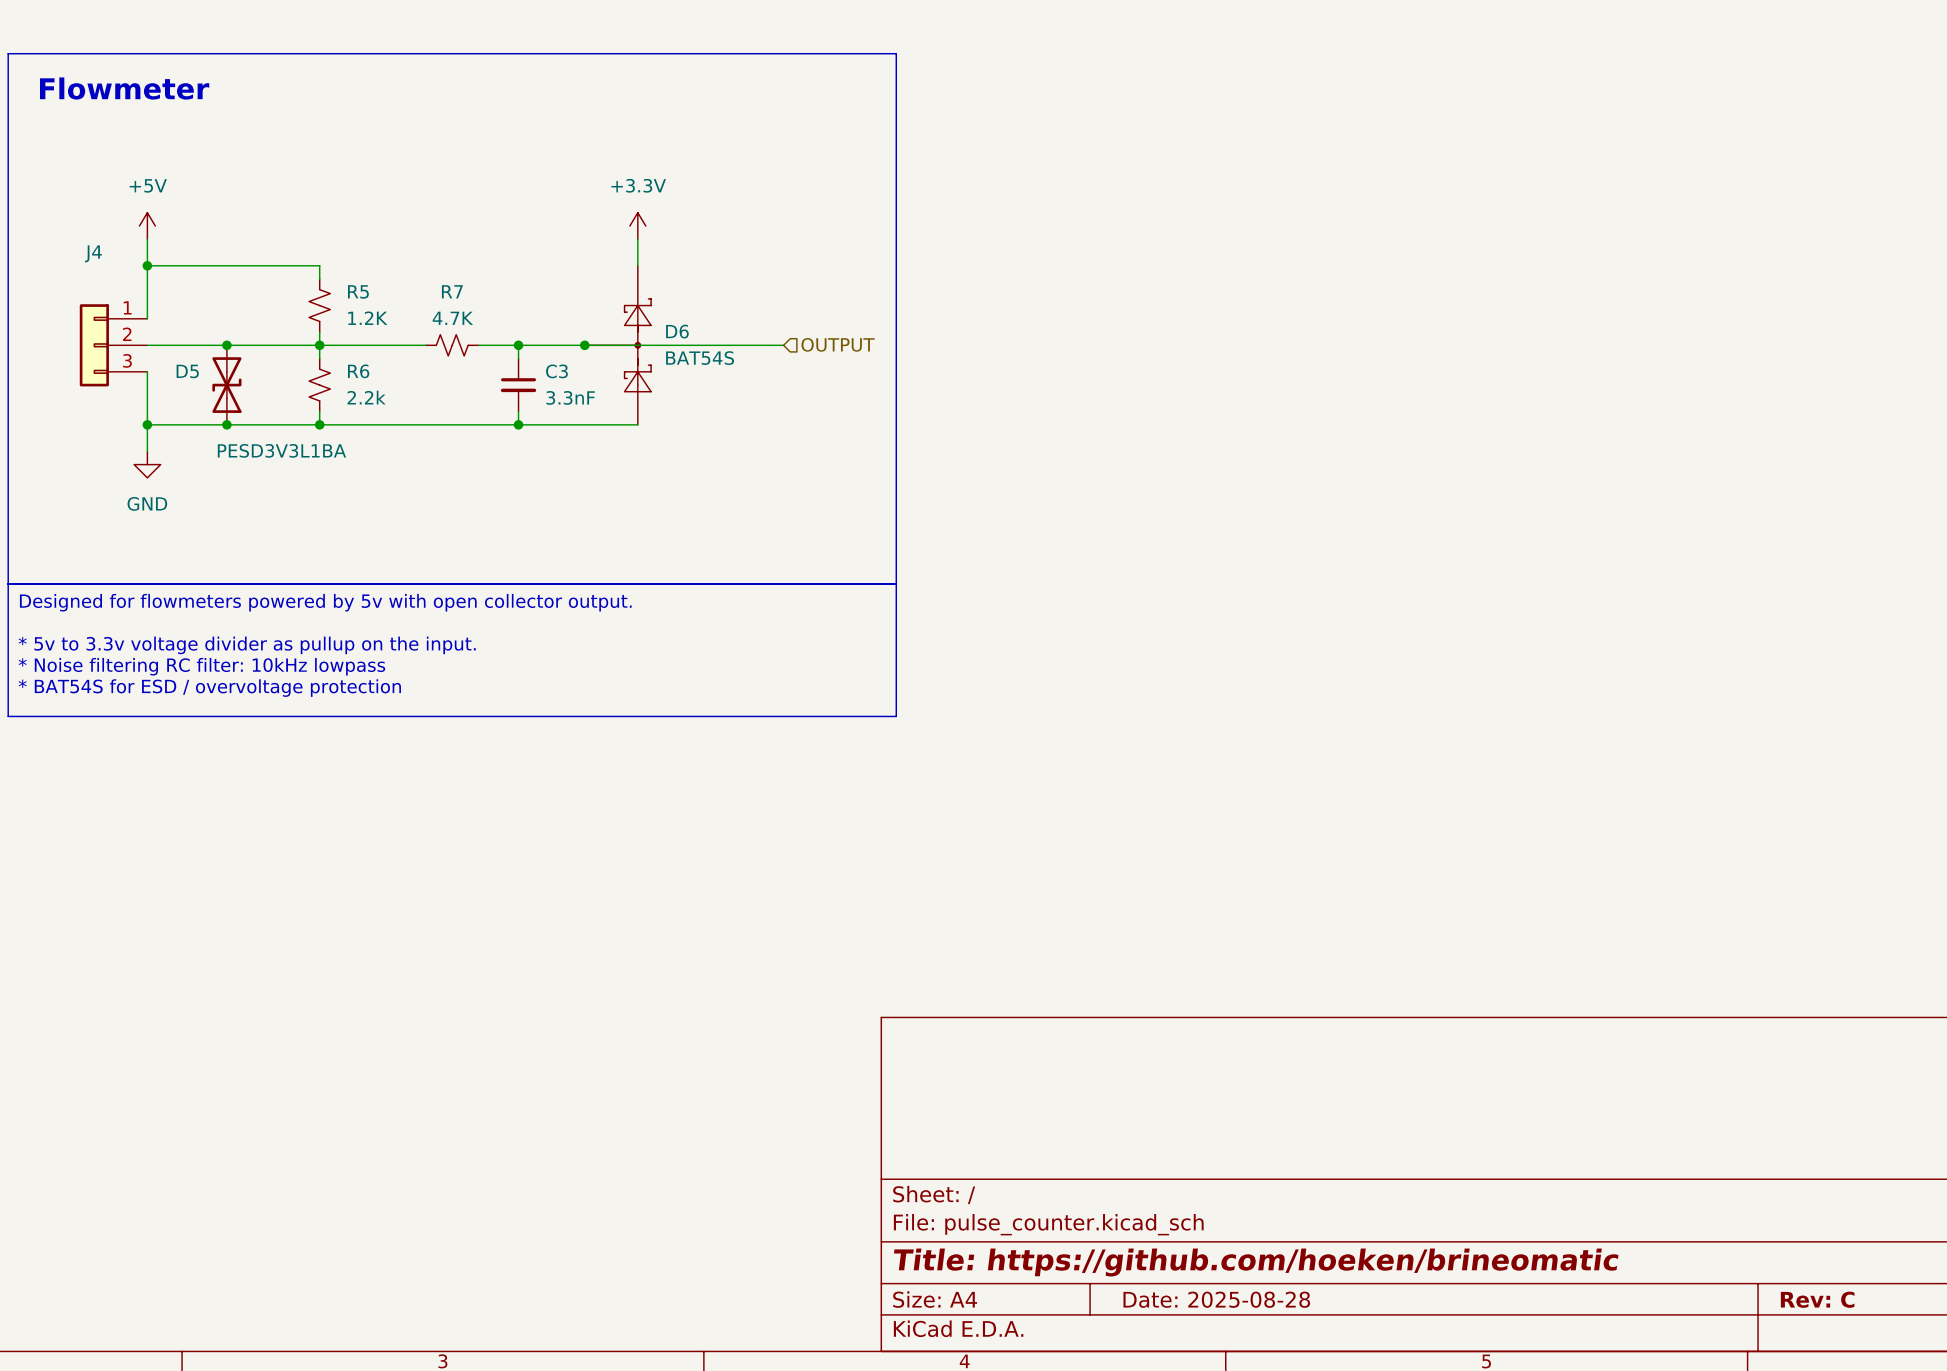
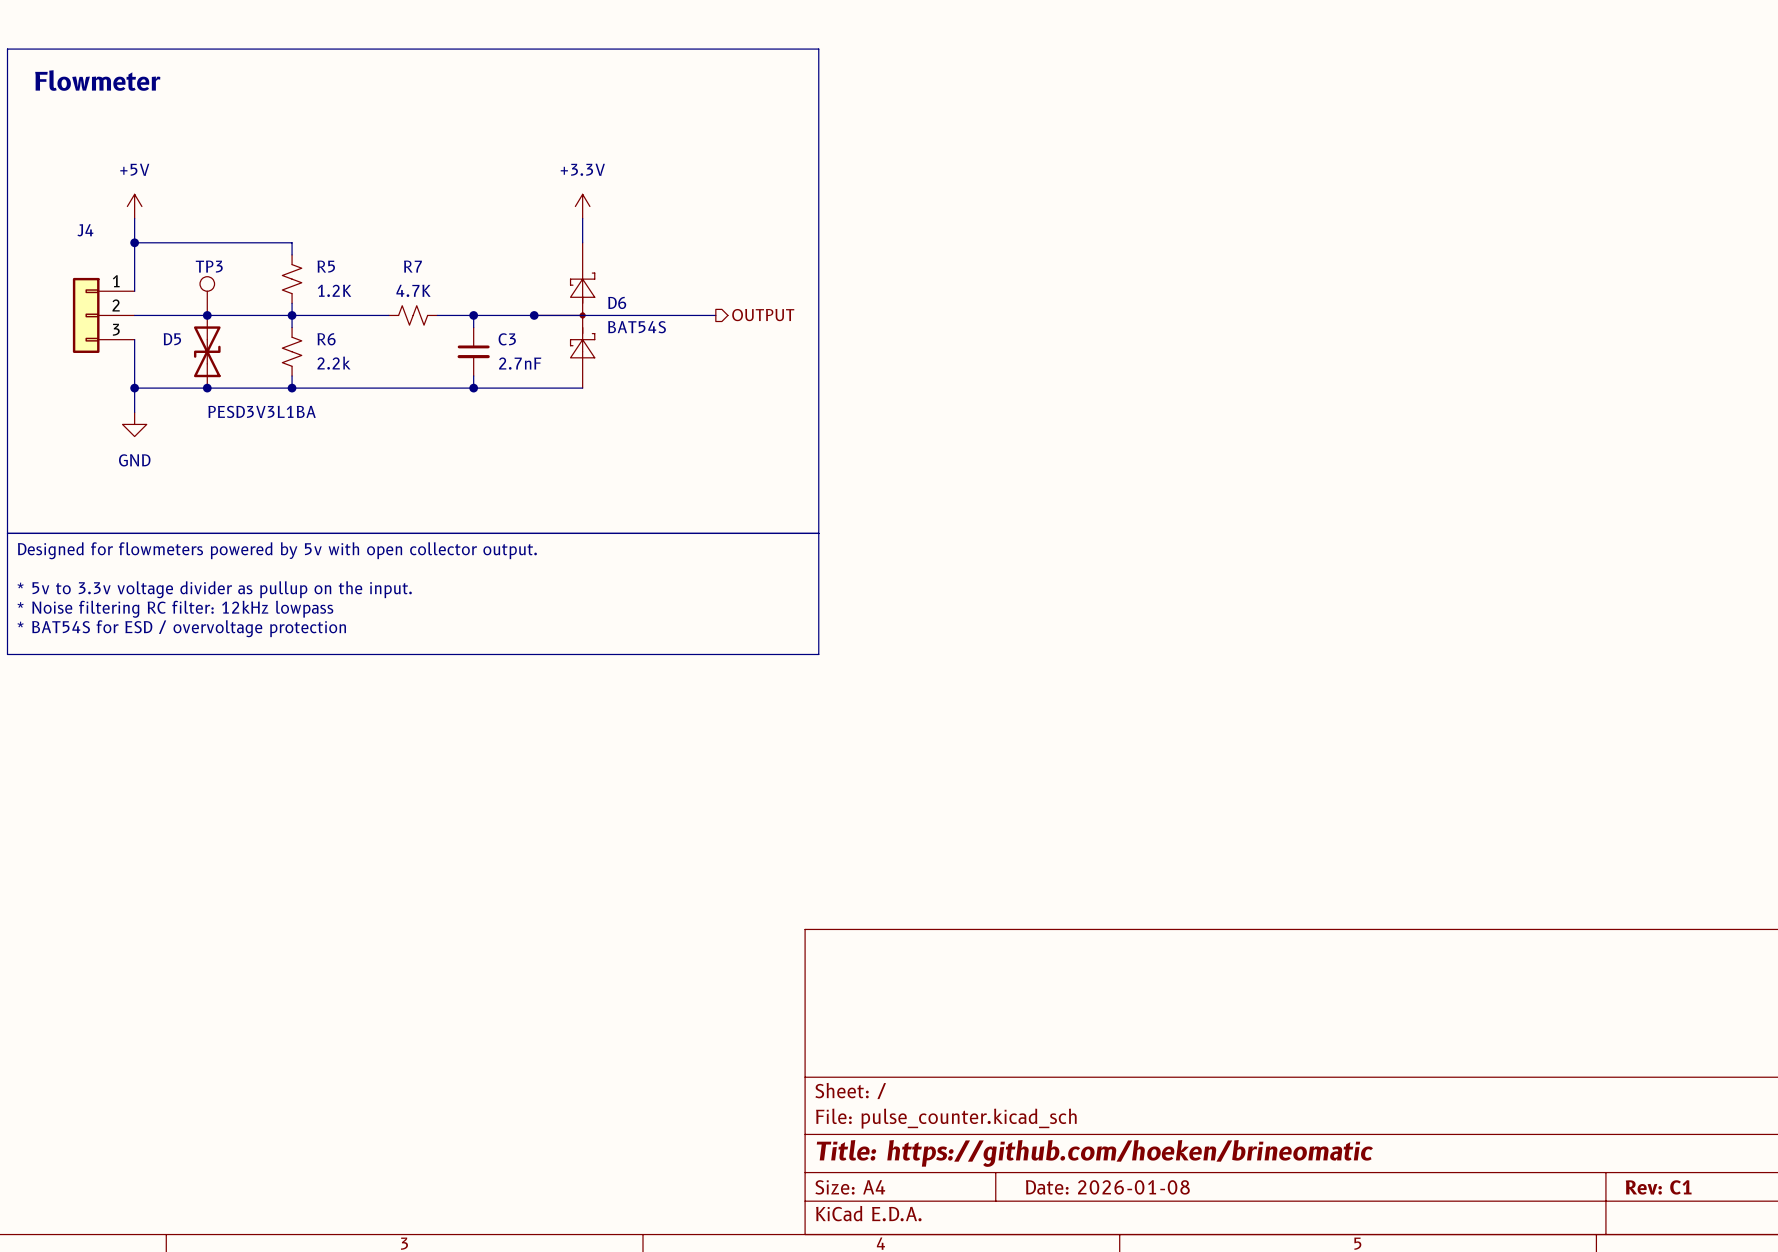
TP3: none -> (207, 296)
hierarchical label shape: input (838, 344) -> output (763, 315)
C3 value: 3.3nF (570, 397) -> 2.7nF (520, 363)
text: * Noise filtering RC filter: 10kHz lowpass (201, 666) -> * Noise filtering RC filter: 12kHz lowpass (175, 609)
title block: Date: 2025-08-28 (1216, 1299) -> Date: 2026-01-08 (1107, 1187)
title block: Rev: C (1817, 1299) -> Rev: C1 (1658, 1187)

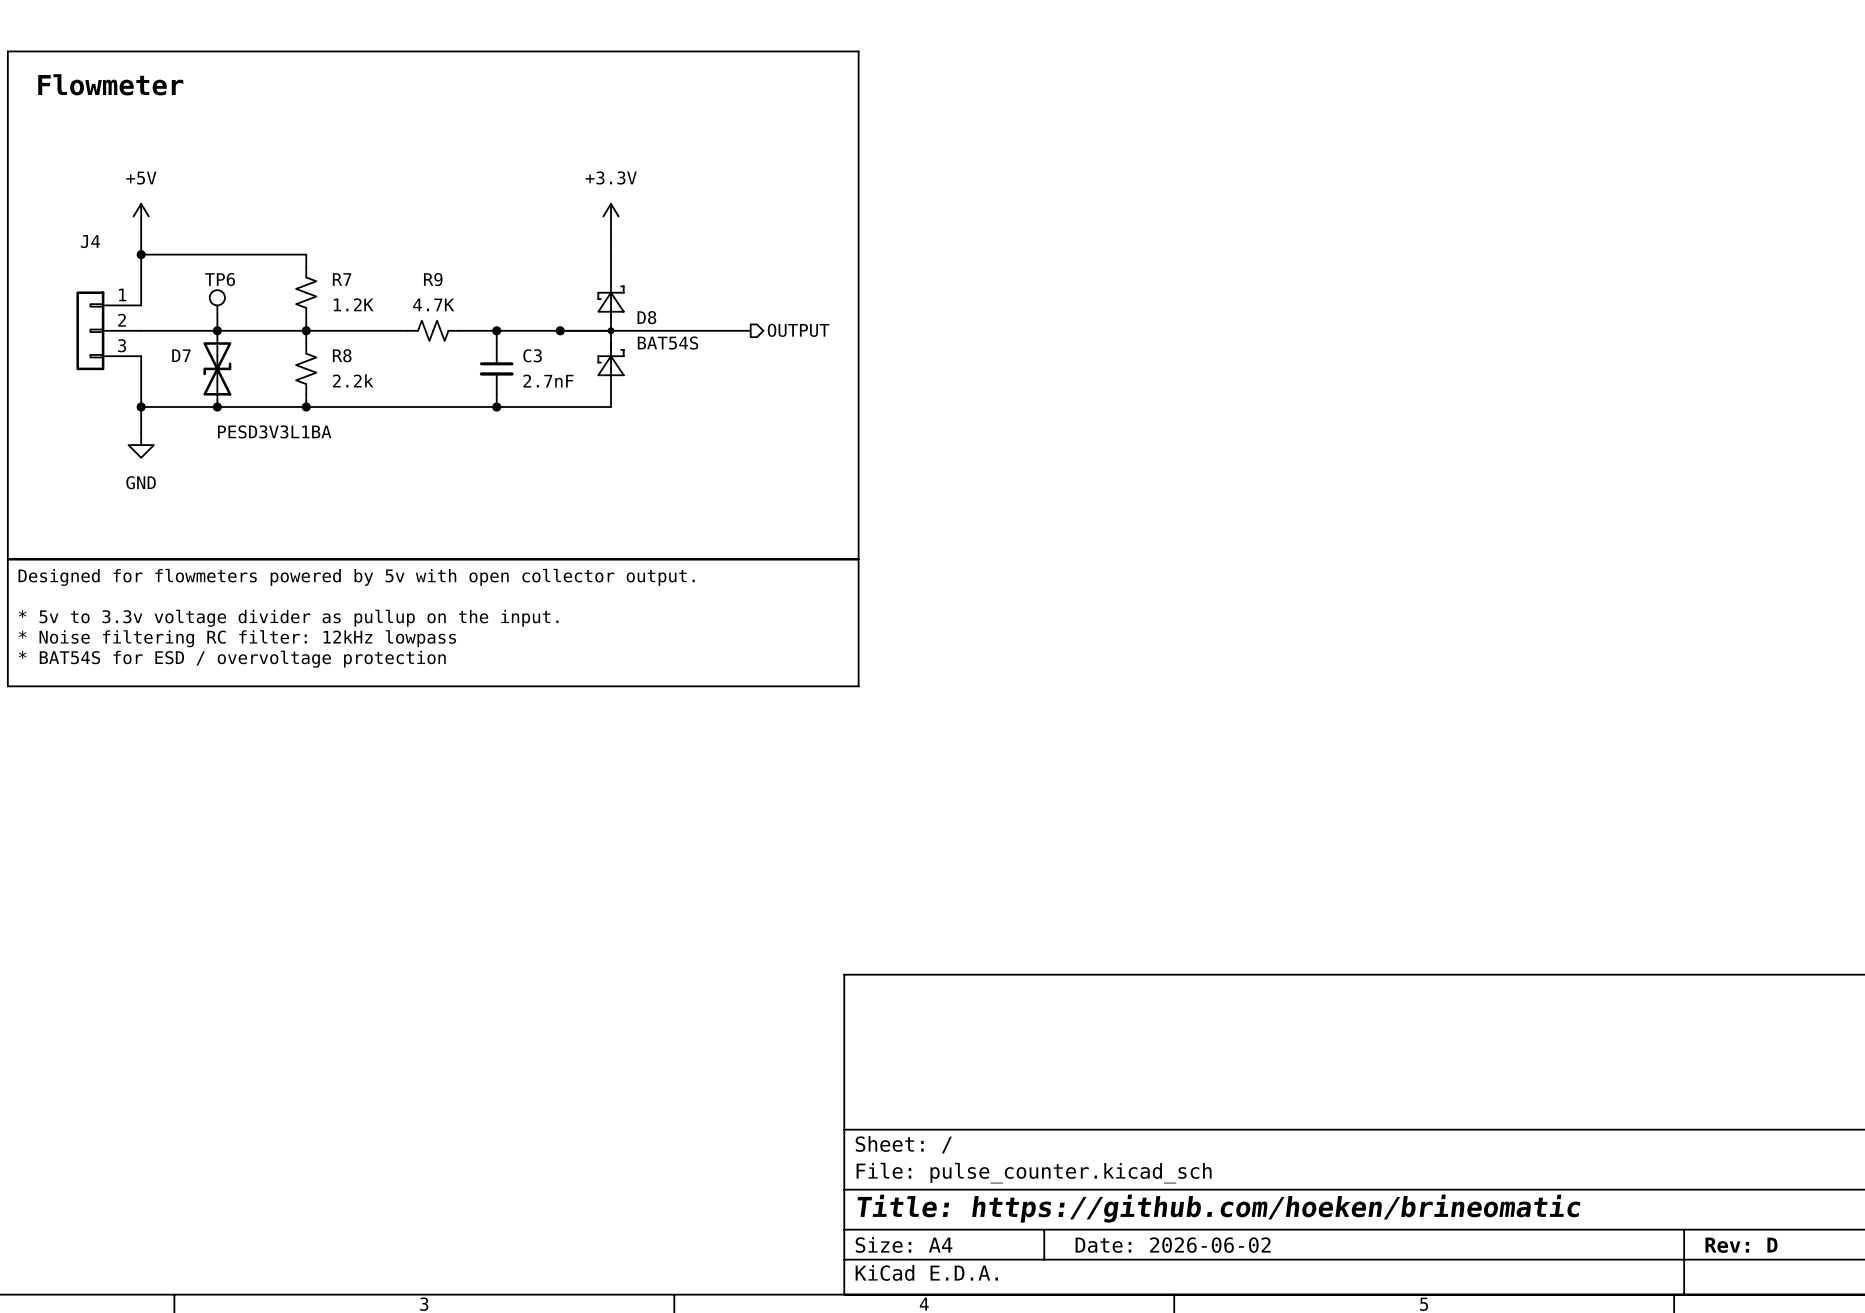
TP3 name: TP3 (209, 266) -> TP6 (220, 279)
R5 name: R5 (326, 266) -> R7 (342, 279)
R7 name: R7 (412, 266) -> R9 (433, 279)
D6 name: D6 (617, 302) -> D8 (646, 317)
D5 name: D5 (172, 339) -> D7 (181, 355)
R6 name: R6 (326, 339) -> R8 (342, 355)
title block: Date: 2026-01-08 (1107, 1187) -> Date: 2026-06-02 (1173, 1245)
title block: Rev: C1 (1658, 1187) -> Rev: D (1741, 1245)

